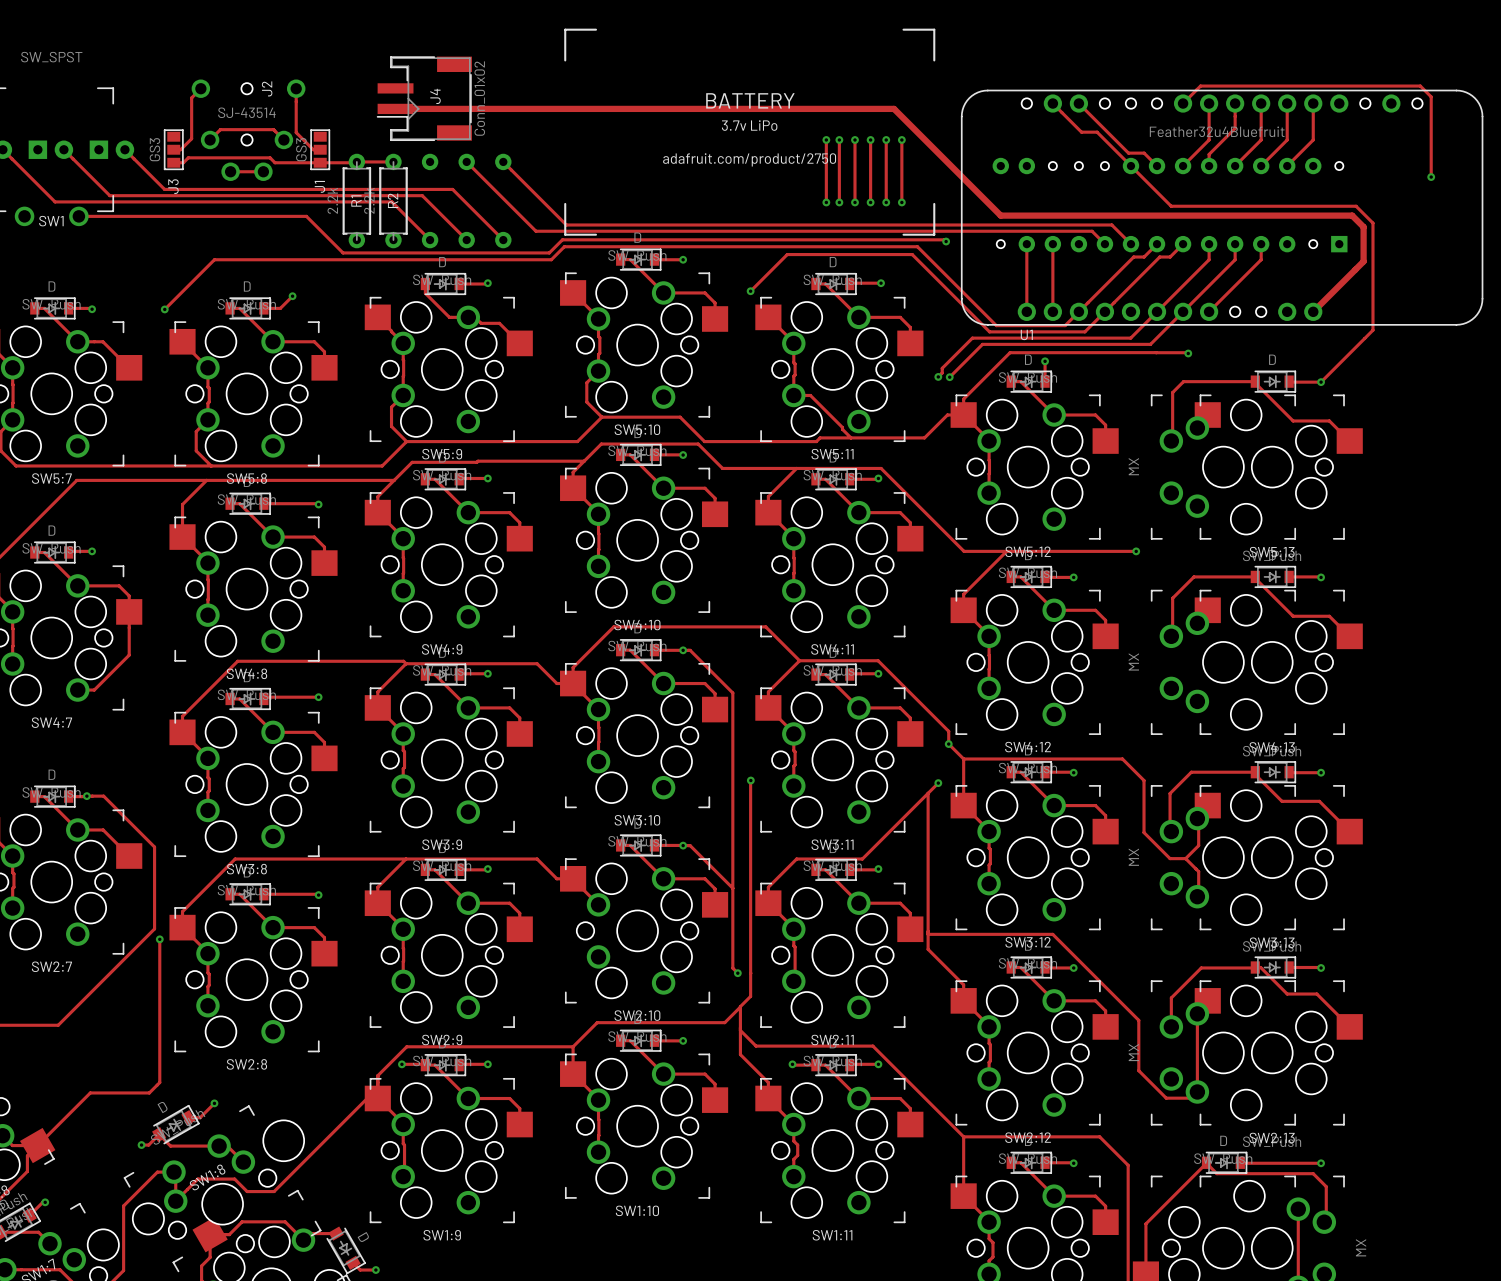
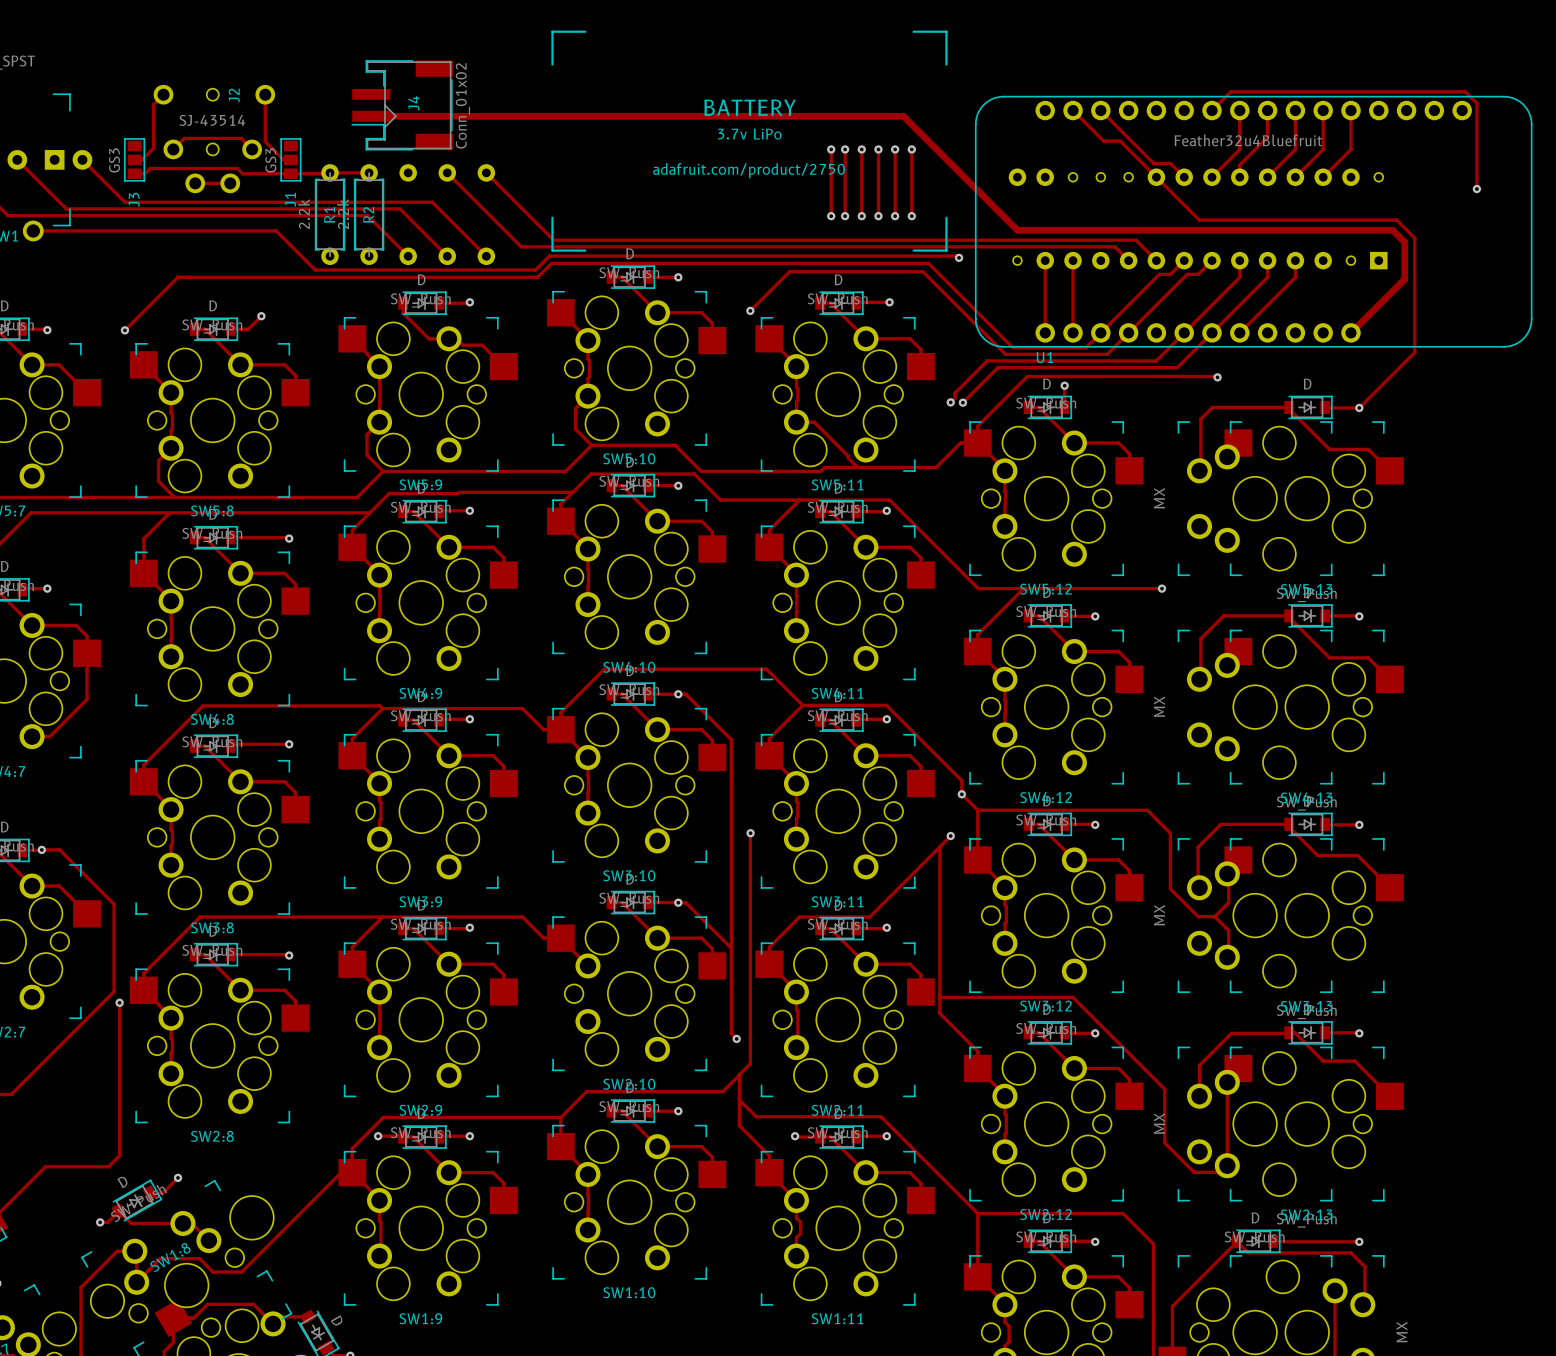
U1 footprint: [960, 89, 1484, 326] -> [974, 95, 1533, 348]

